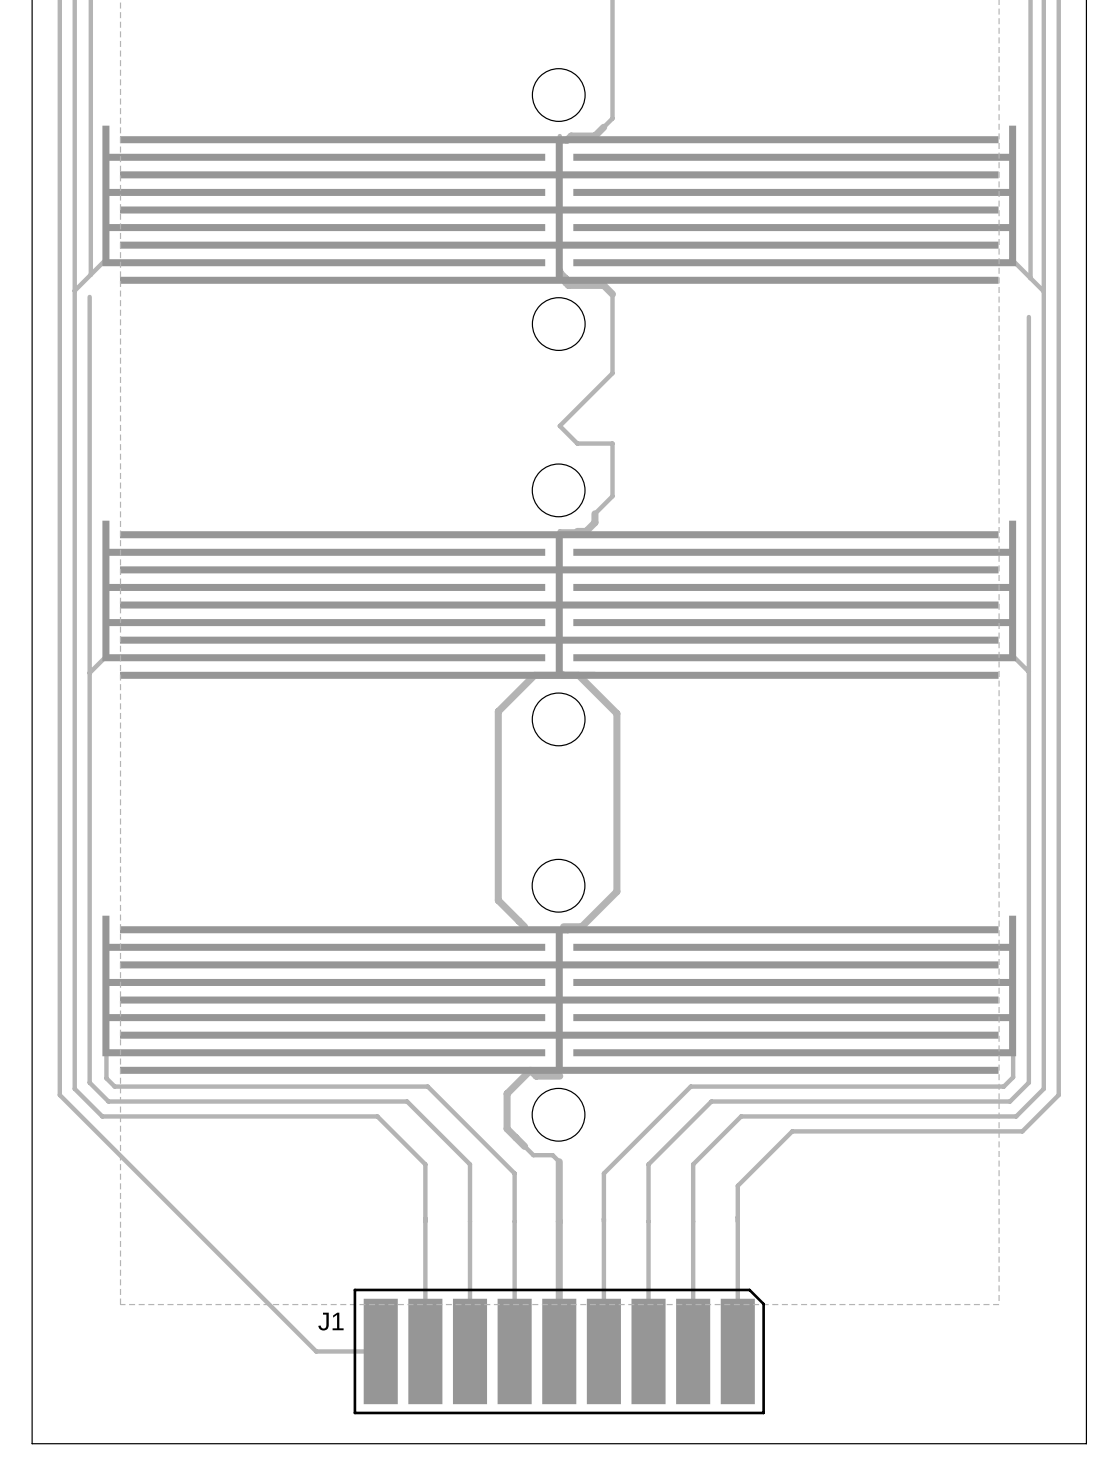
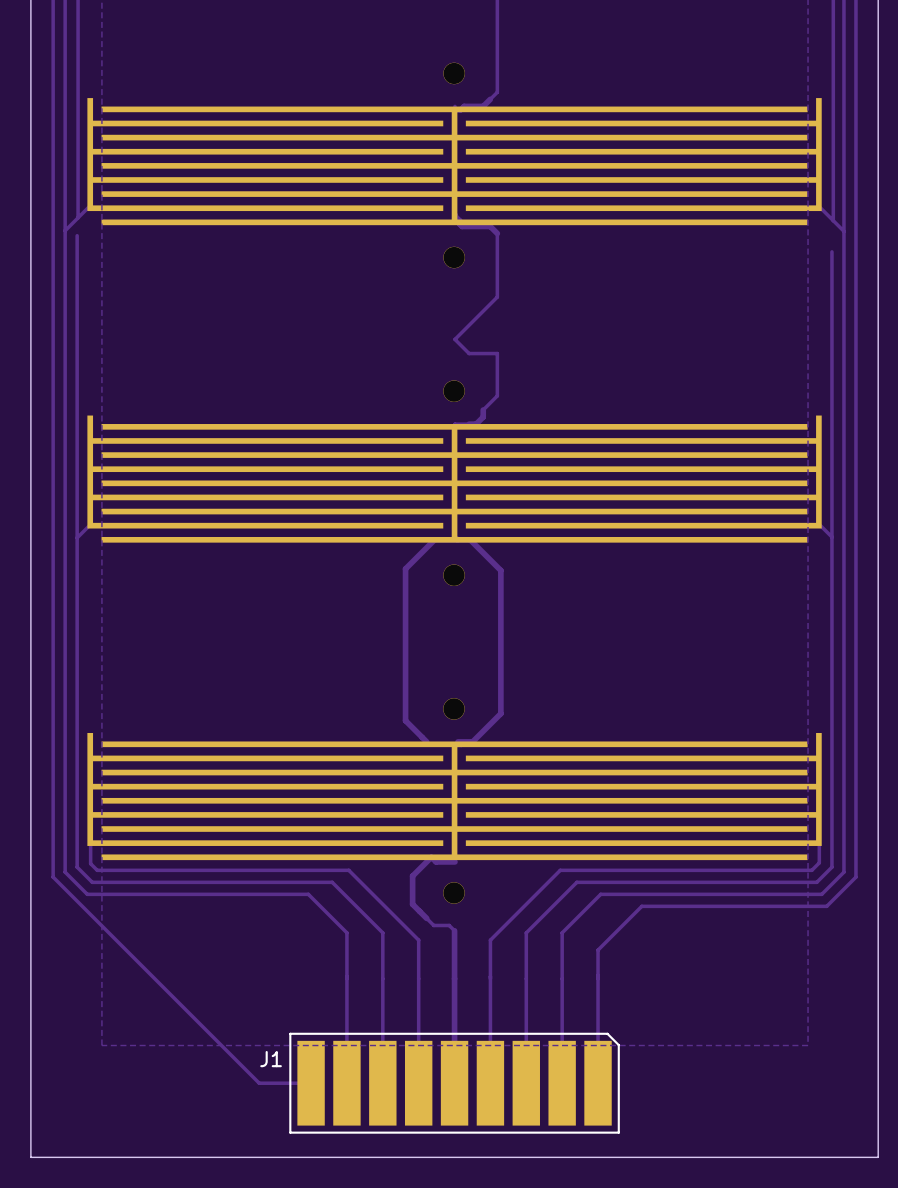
round board edge: [532, 68, 586, 122] -> none
part: none -> (454, 73)
round board edge: [532, 297, 586, 351] -> none
part: none -> (454, 257)
round board edge: [532, 464, 586, 517] -> none
part: none -> (454, 391)
round board edge: [532, 693, 586, 746] -> none
part: none -> (454, 575)
round board edge: [532, 859, 585, 913] -> none
part: none -> (453, 708)
round board edge: [532, 1088, 585, 1142] -> none
part: none -> (453, 893)

